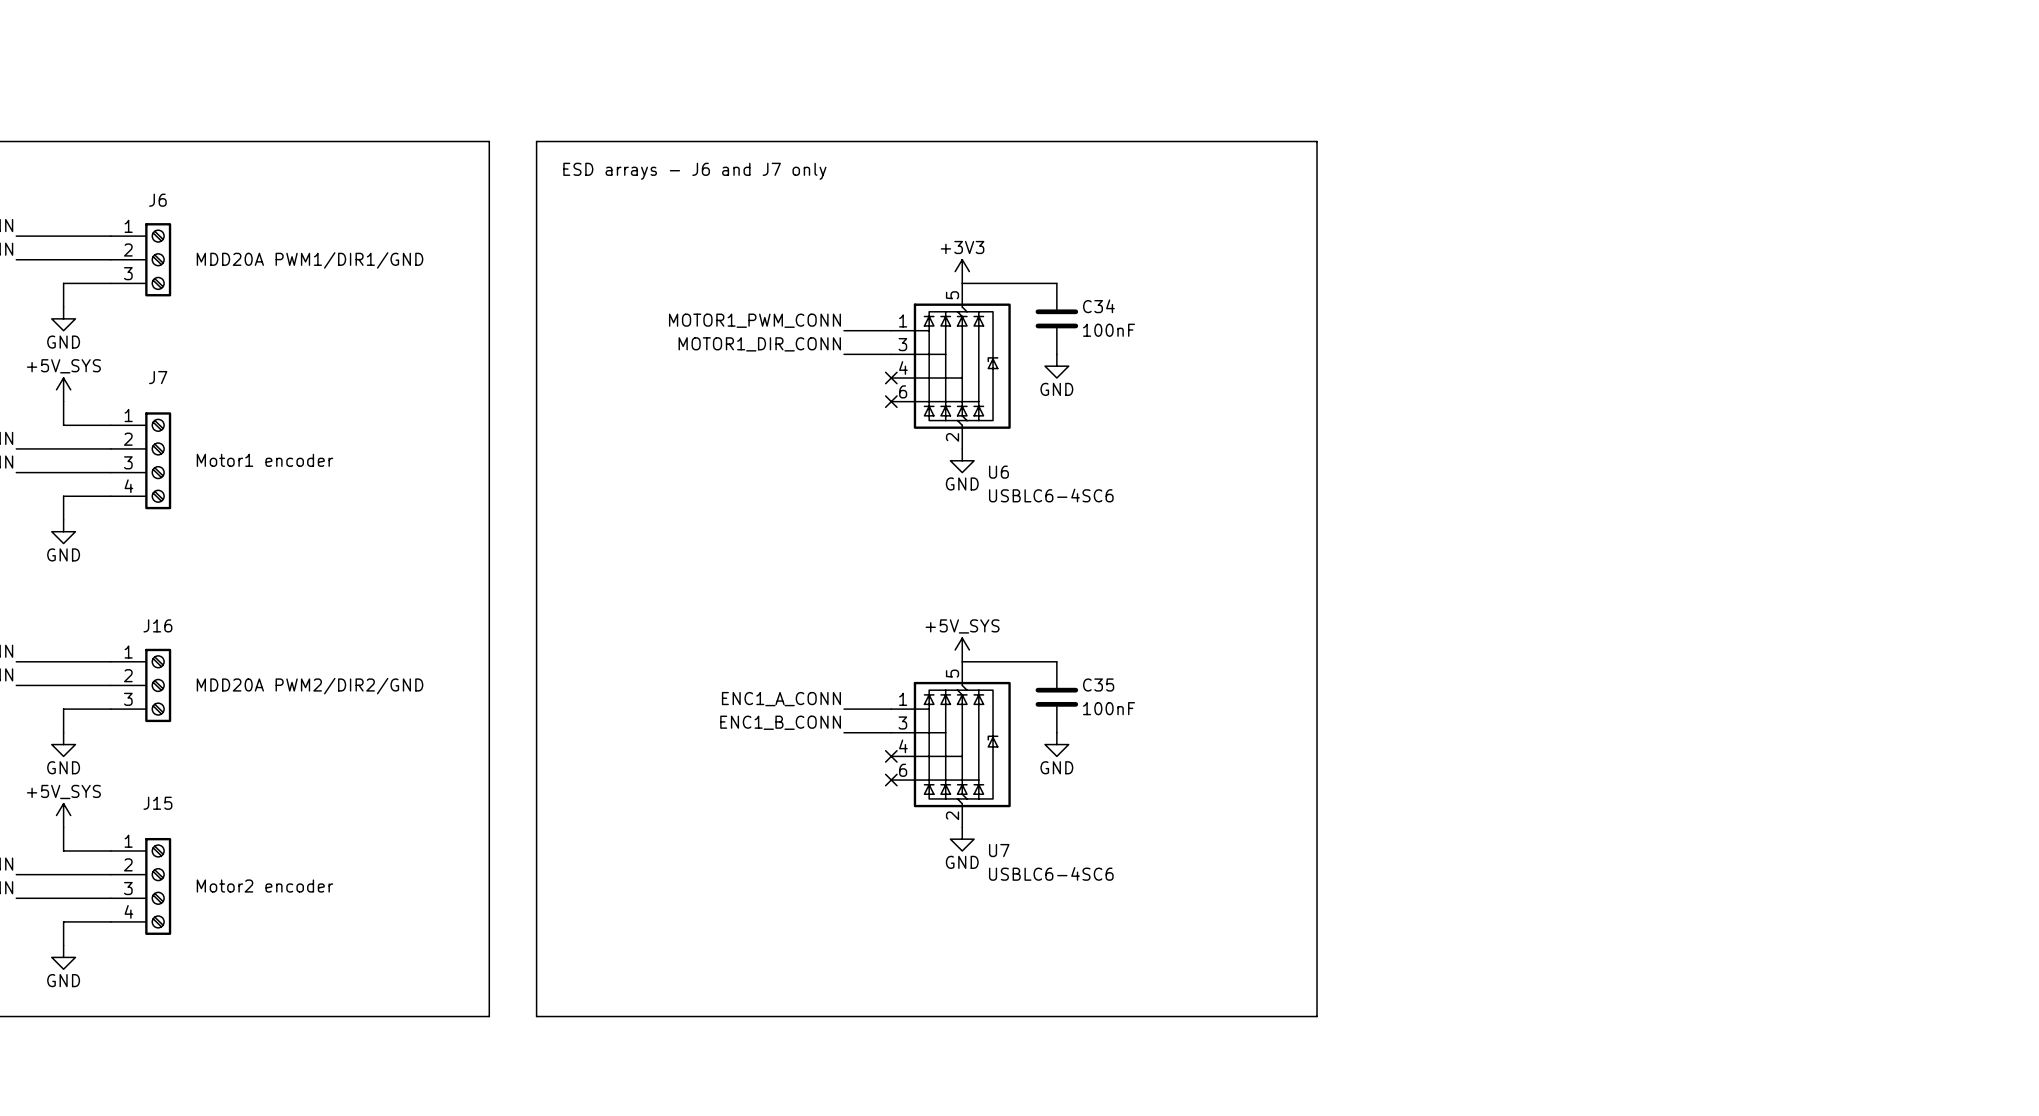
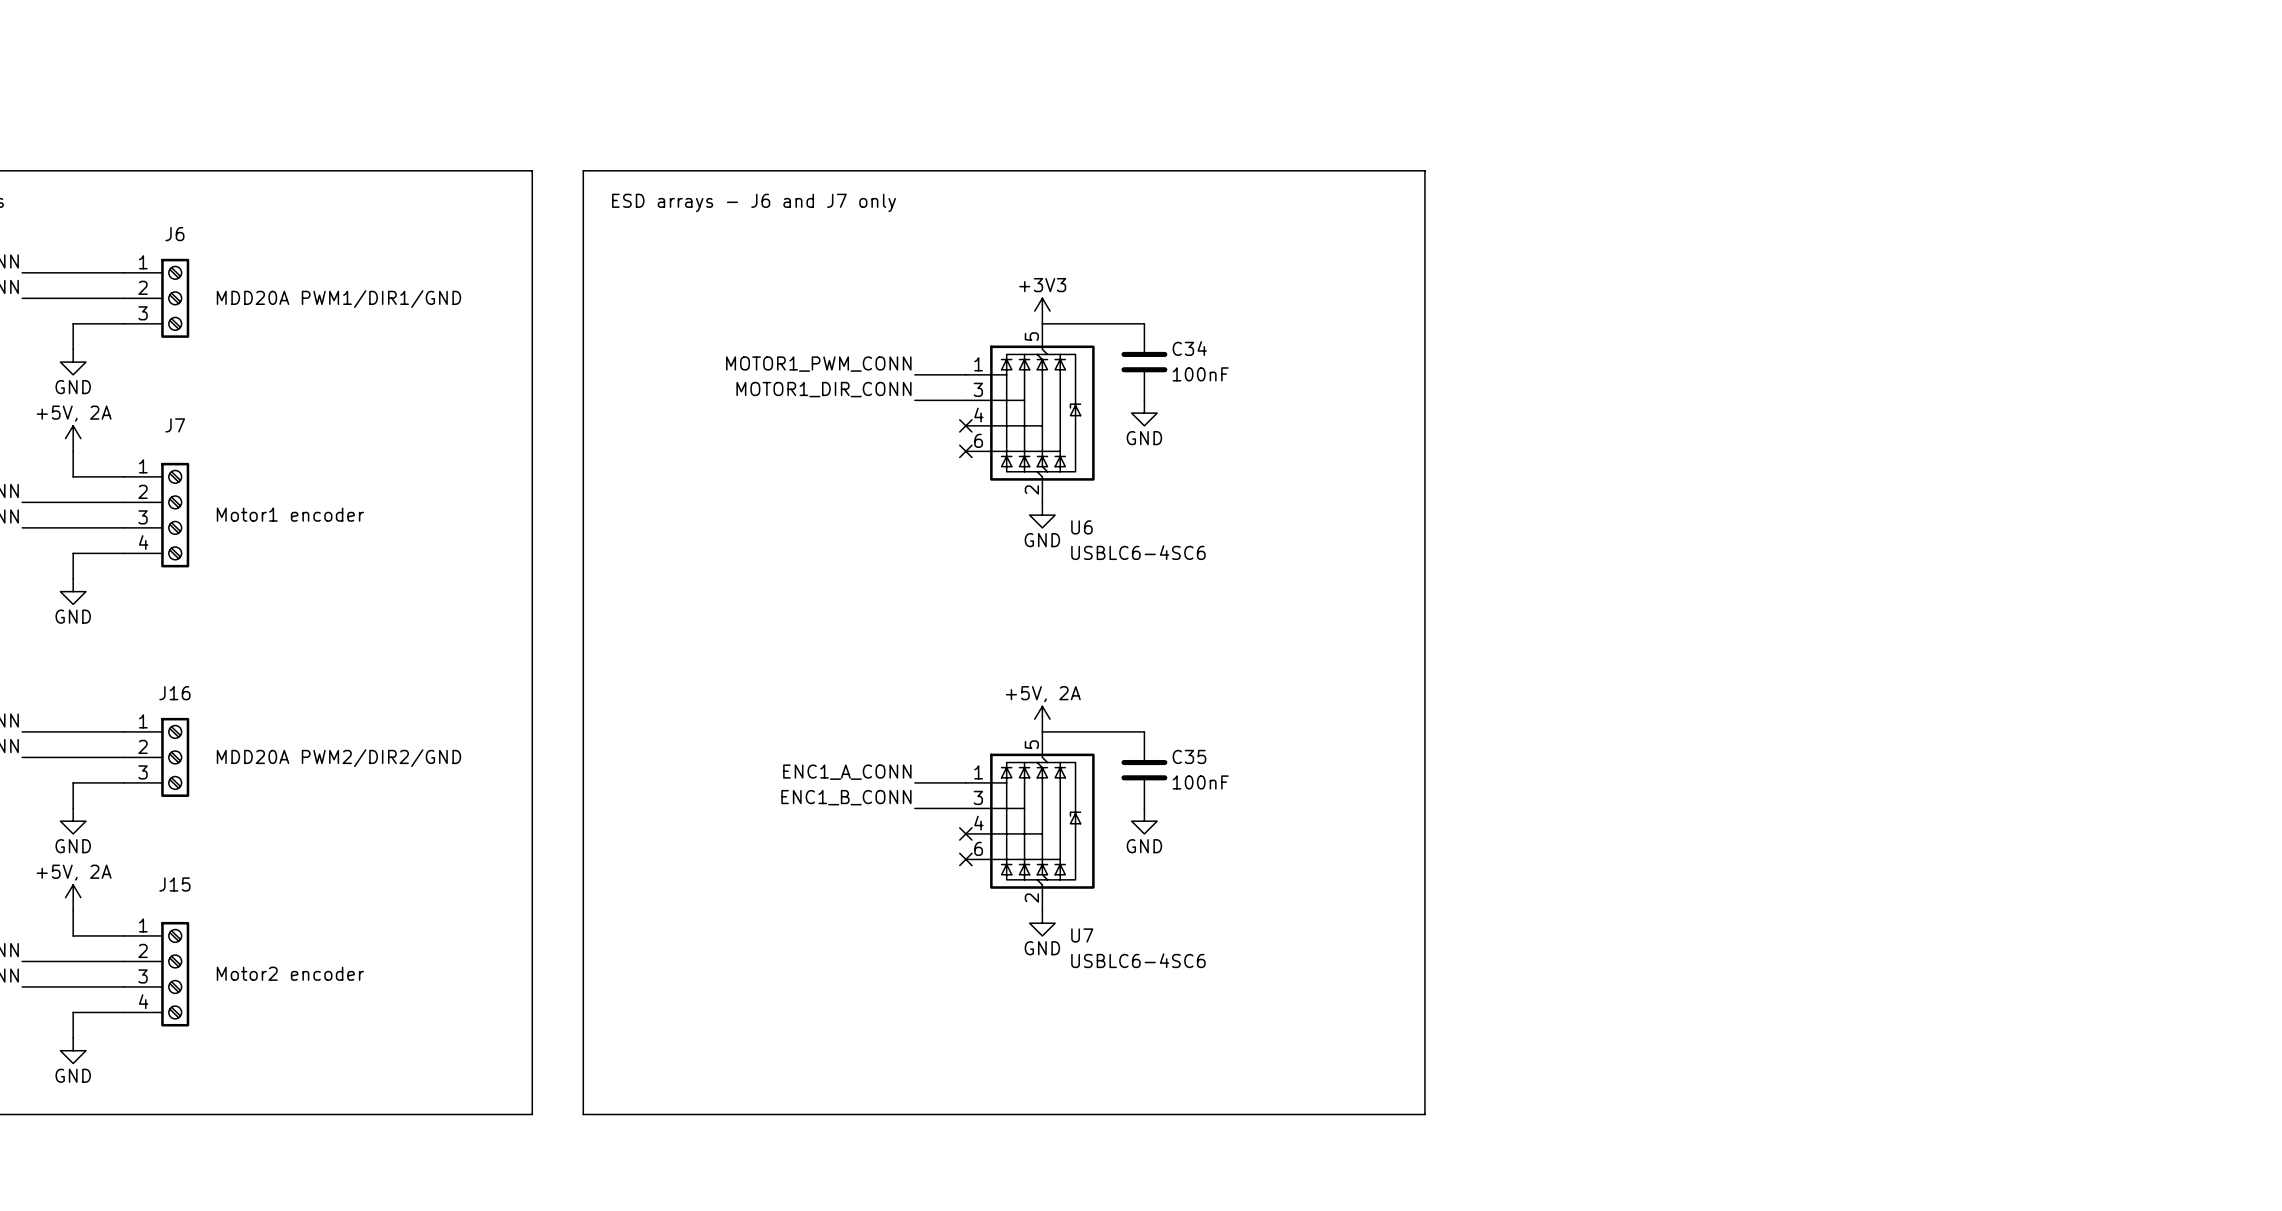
power symbol: +5V_SYS (63, 389) -> +5V, 2A (73, 438)
power symbol: +5V_SYS (962, 649) -> +5V, 2A (1042, 719)
power symbol: +5V_SYS (63, 815) -> +5V, 2A (73, 897)

